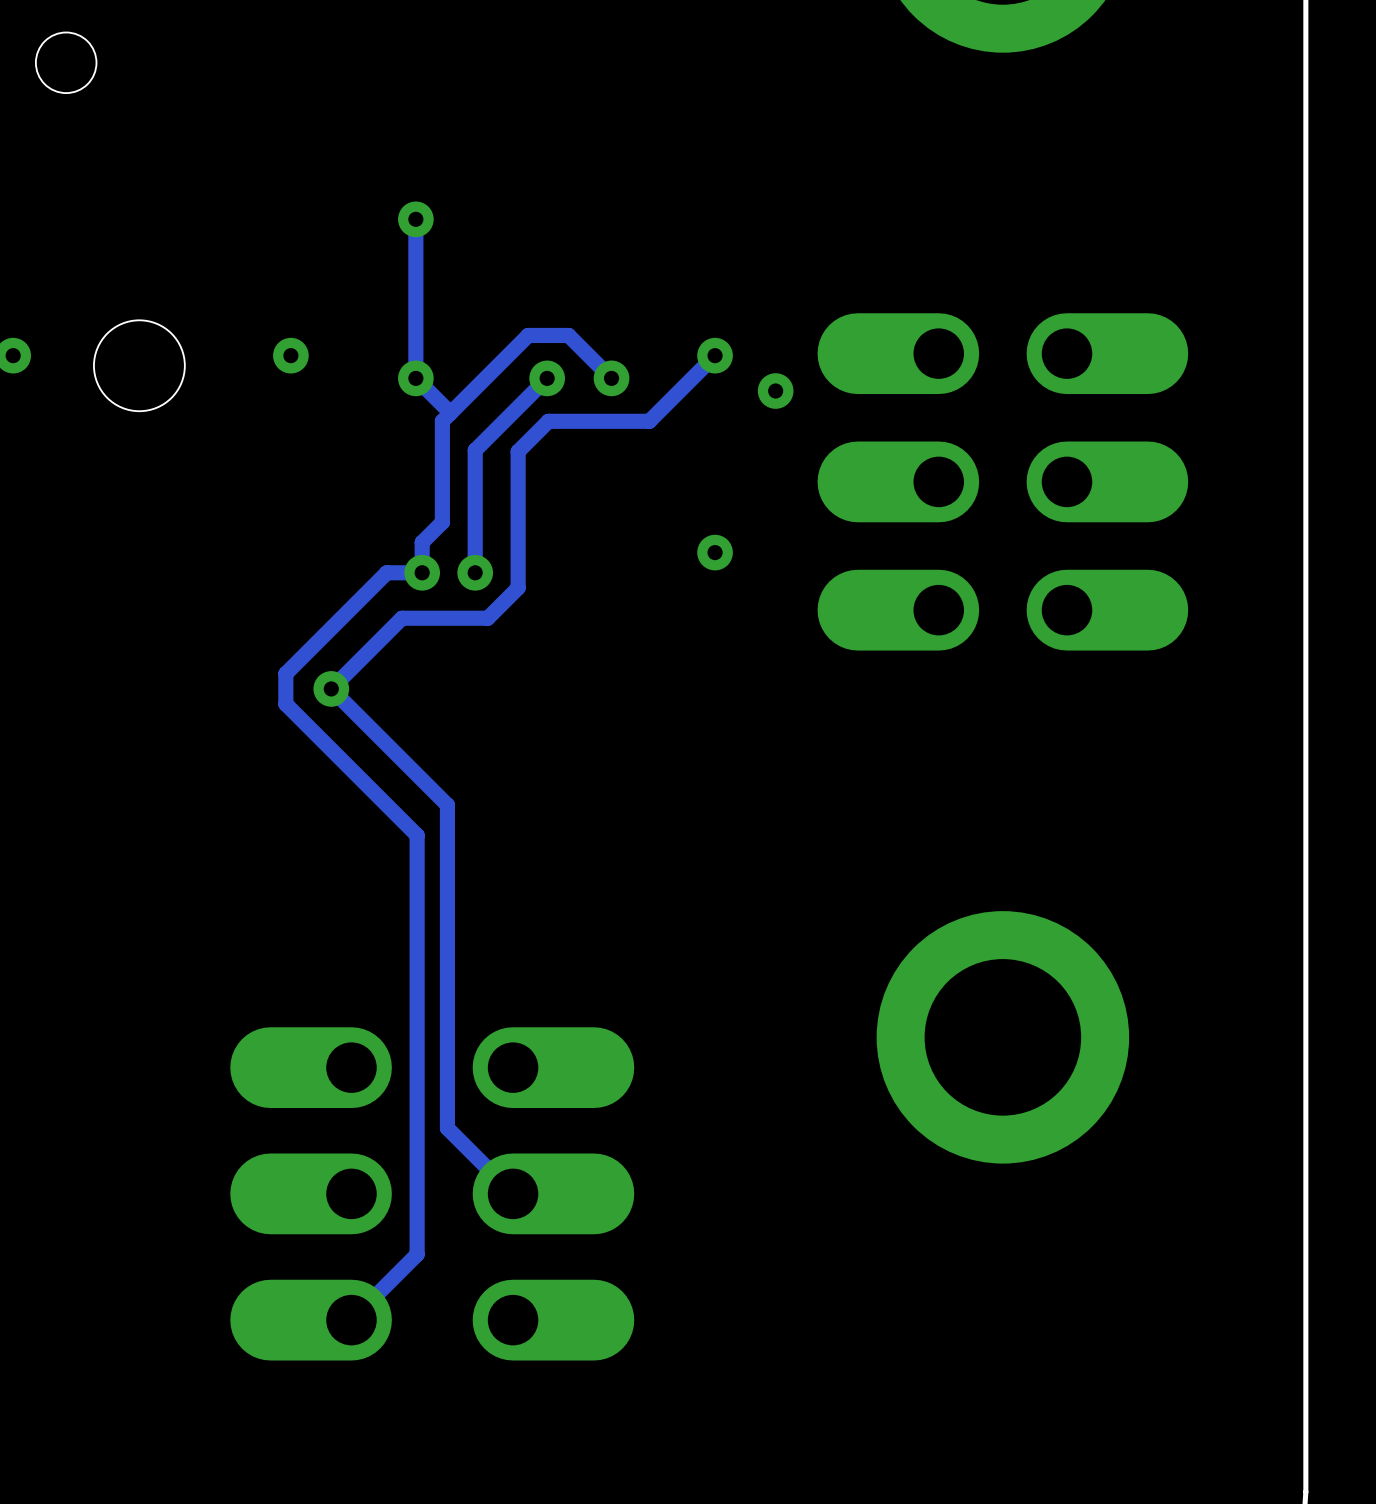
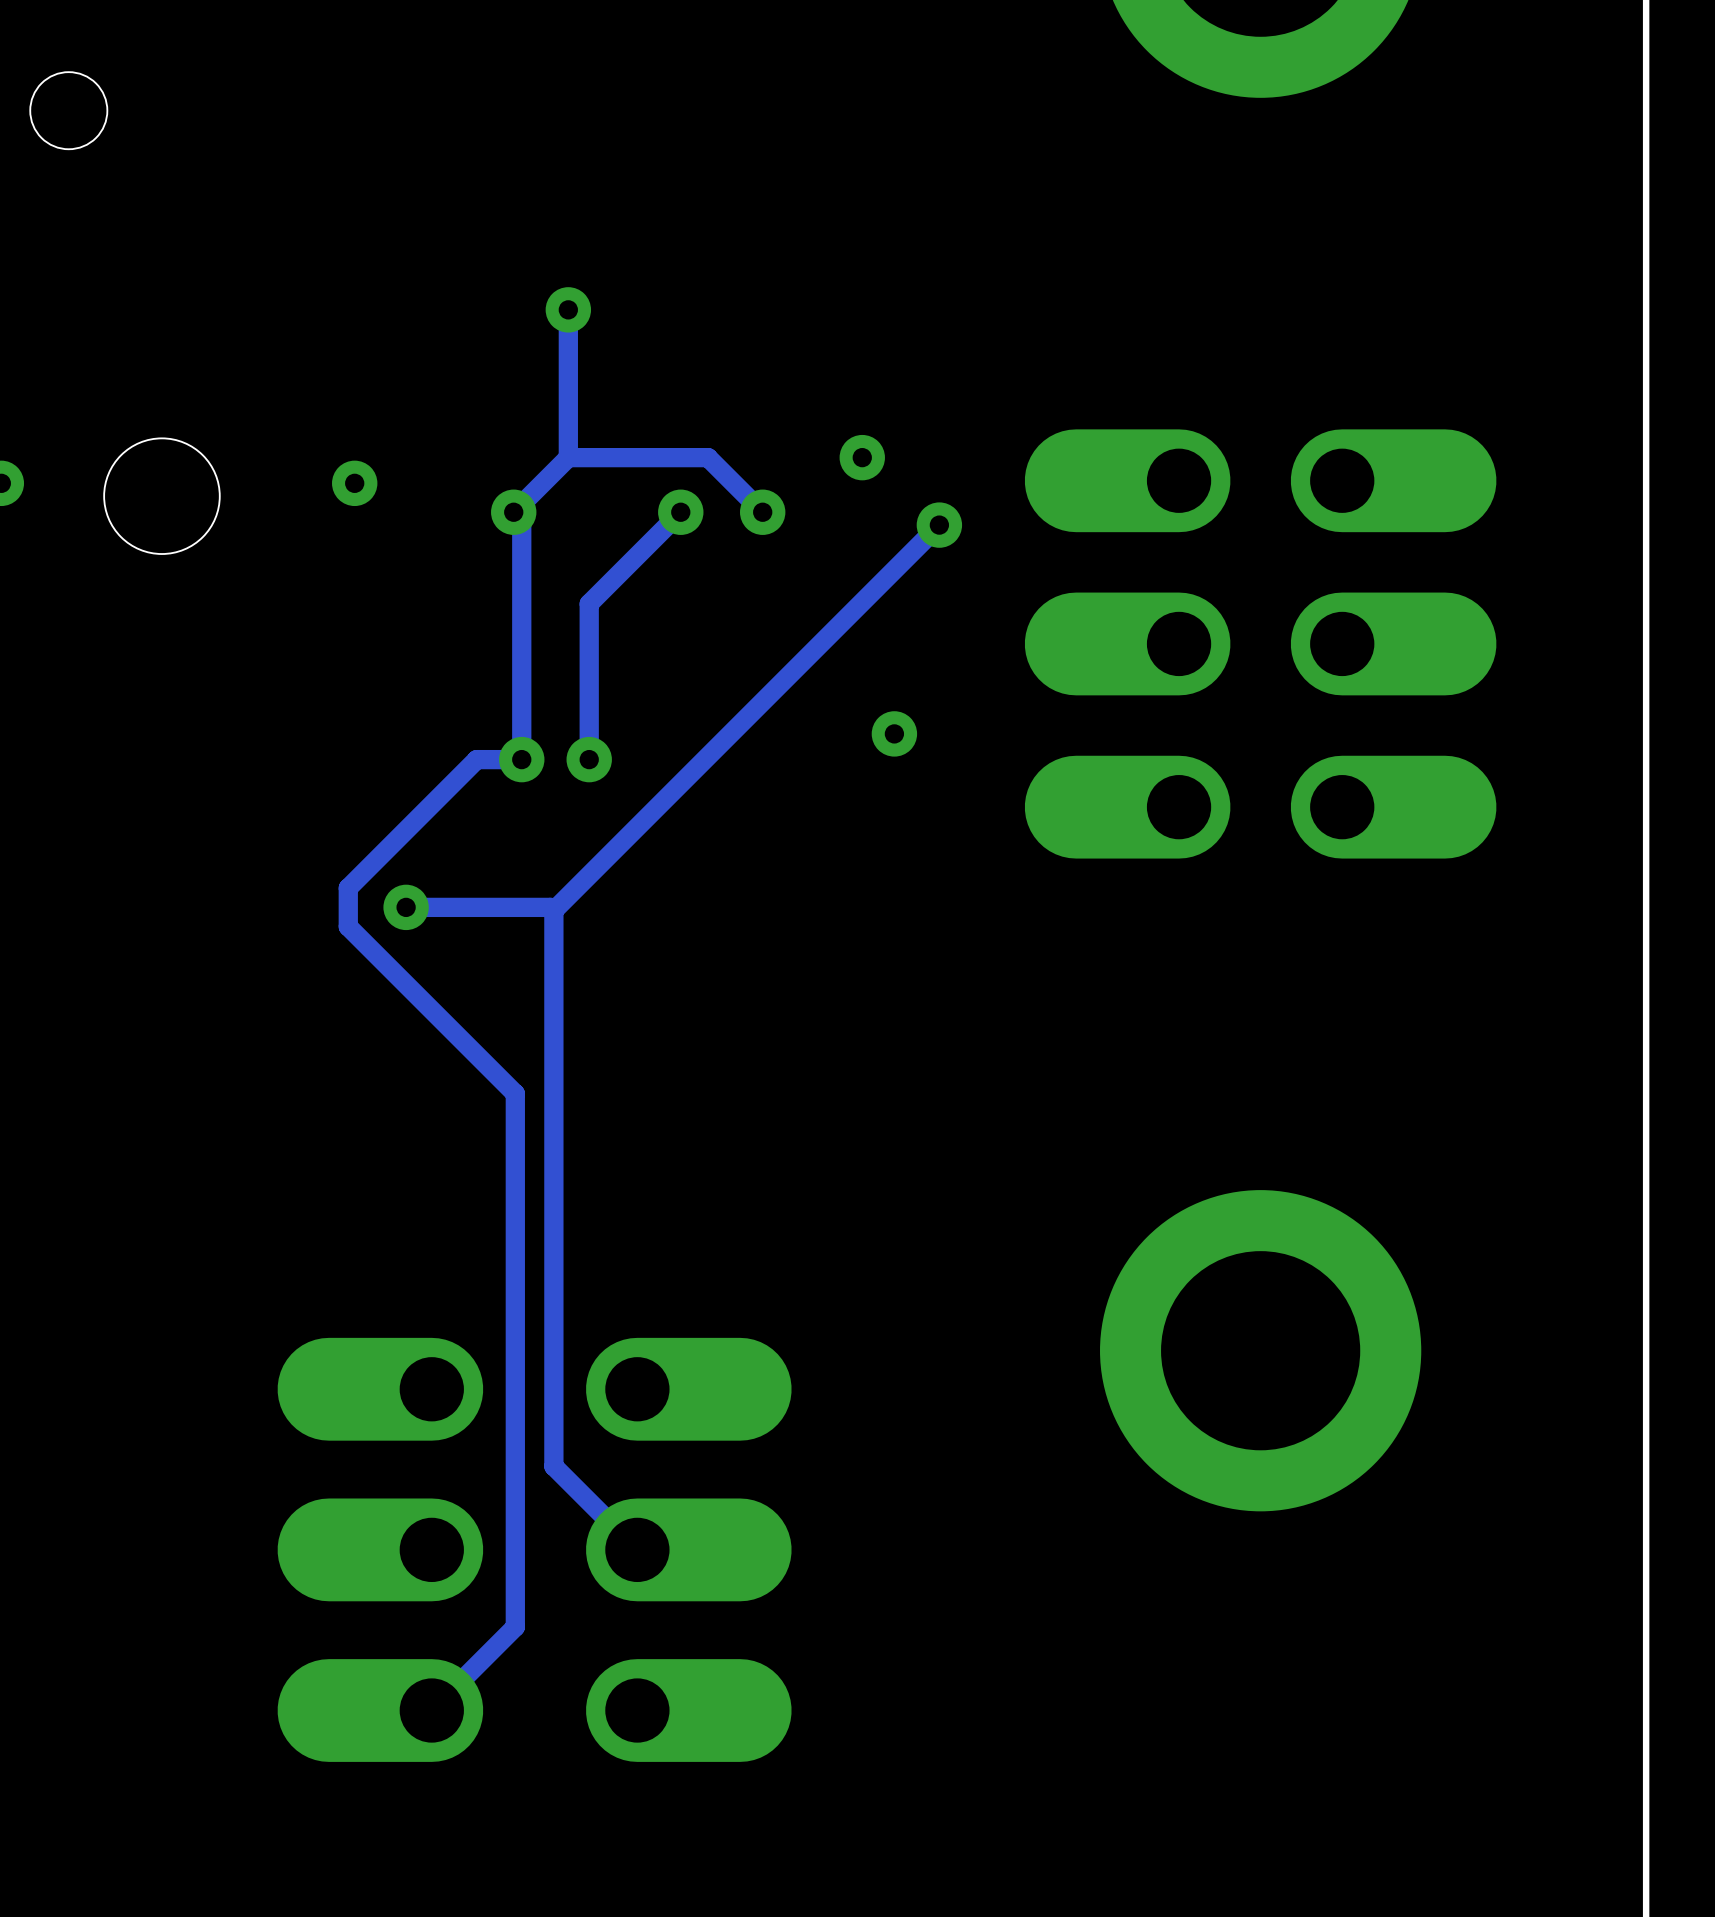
track: (415, 219) (415, 378) -> (568, 457) (513, 512)
via position: (415, 219) -> (568, 309)
track: none -> (568, 309) (568, 457)
track: (528, 335) (442, 421) (442, 522) (422, 542) -> (521, 520) (521, 721)
track: none -> (656, 457) (568, 457)
via: none -> (862, 457)
track: (715, 355) (649, 421) (548, 421) (518, 451) (518, 587) (487, 618) (401, 618) (331, 688) (447, 805) -> (553, 910) (553, 1055)
via: (715, 355) -> none
track: (422, 384) (449, 413) -> none
track: none -> (939, 525) (553, 910)
via: none -> (939, 525)
via: (775, 391) -> none
track: none -> (406, 907) (550, 907) (553, 910)

